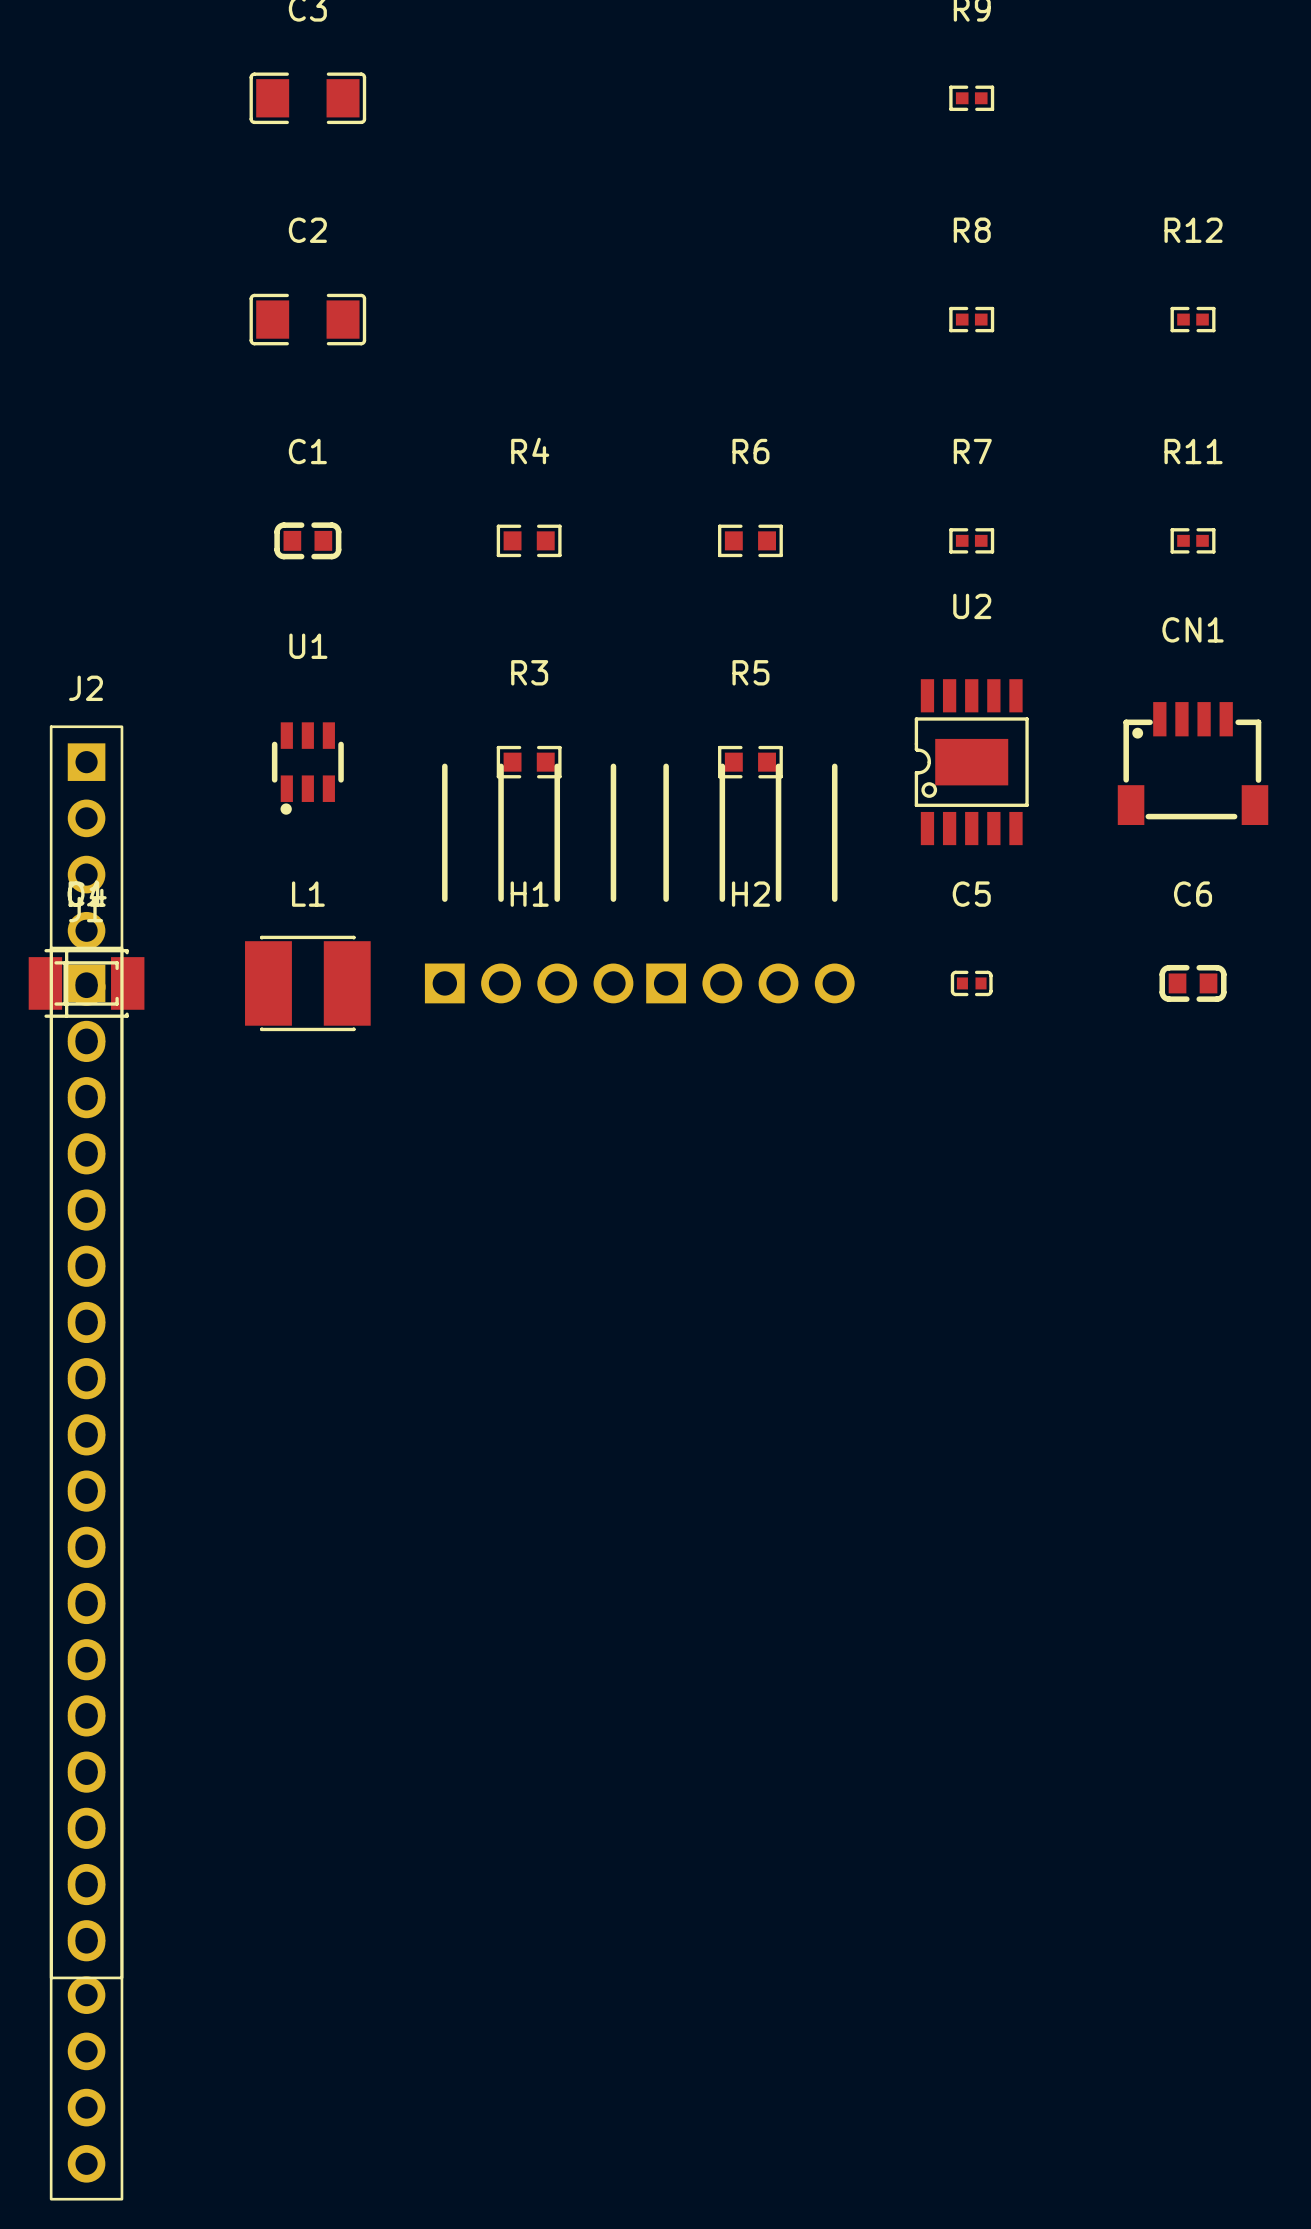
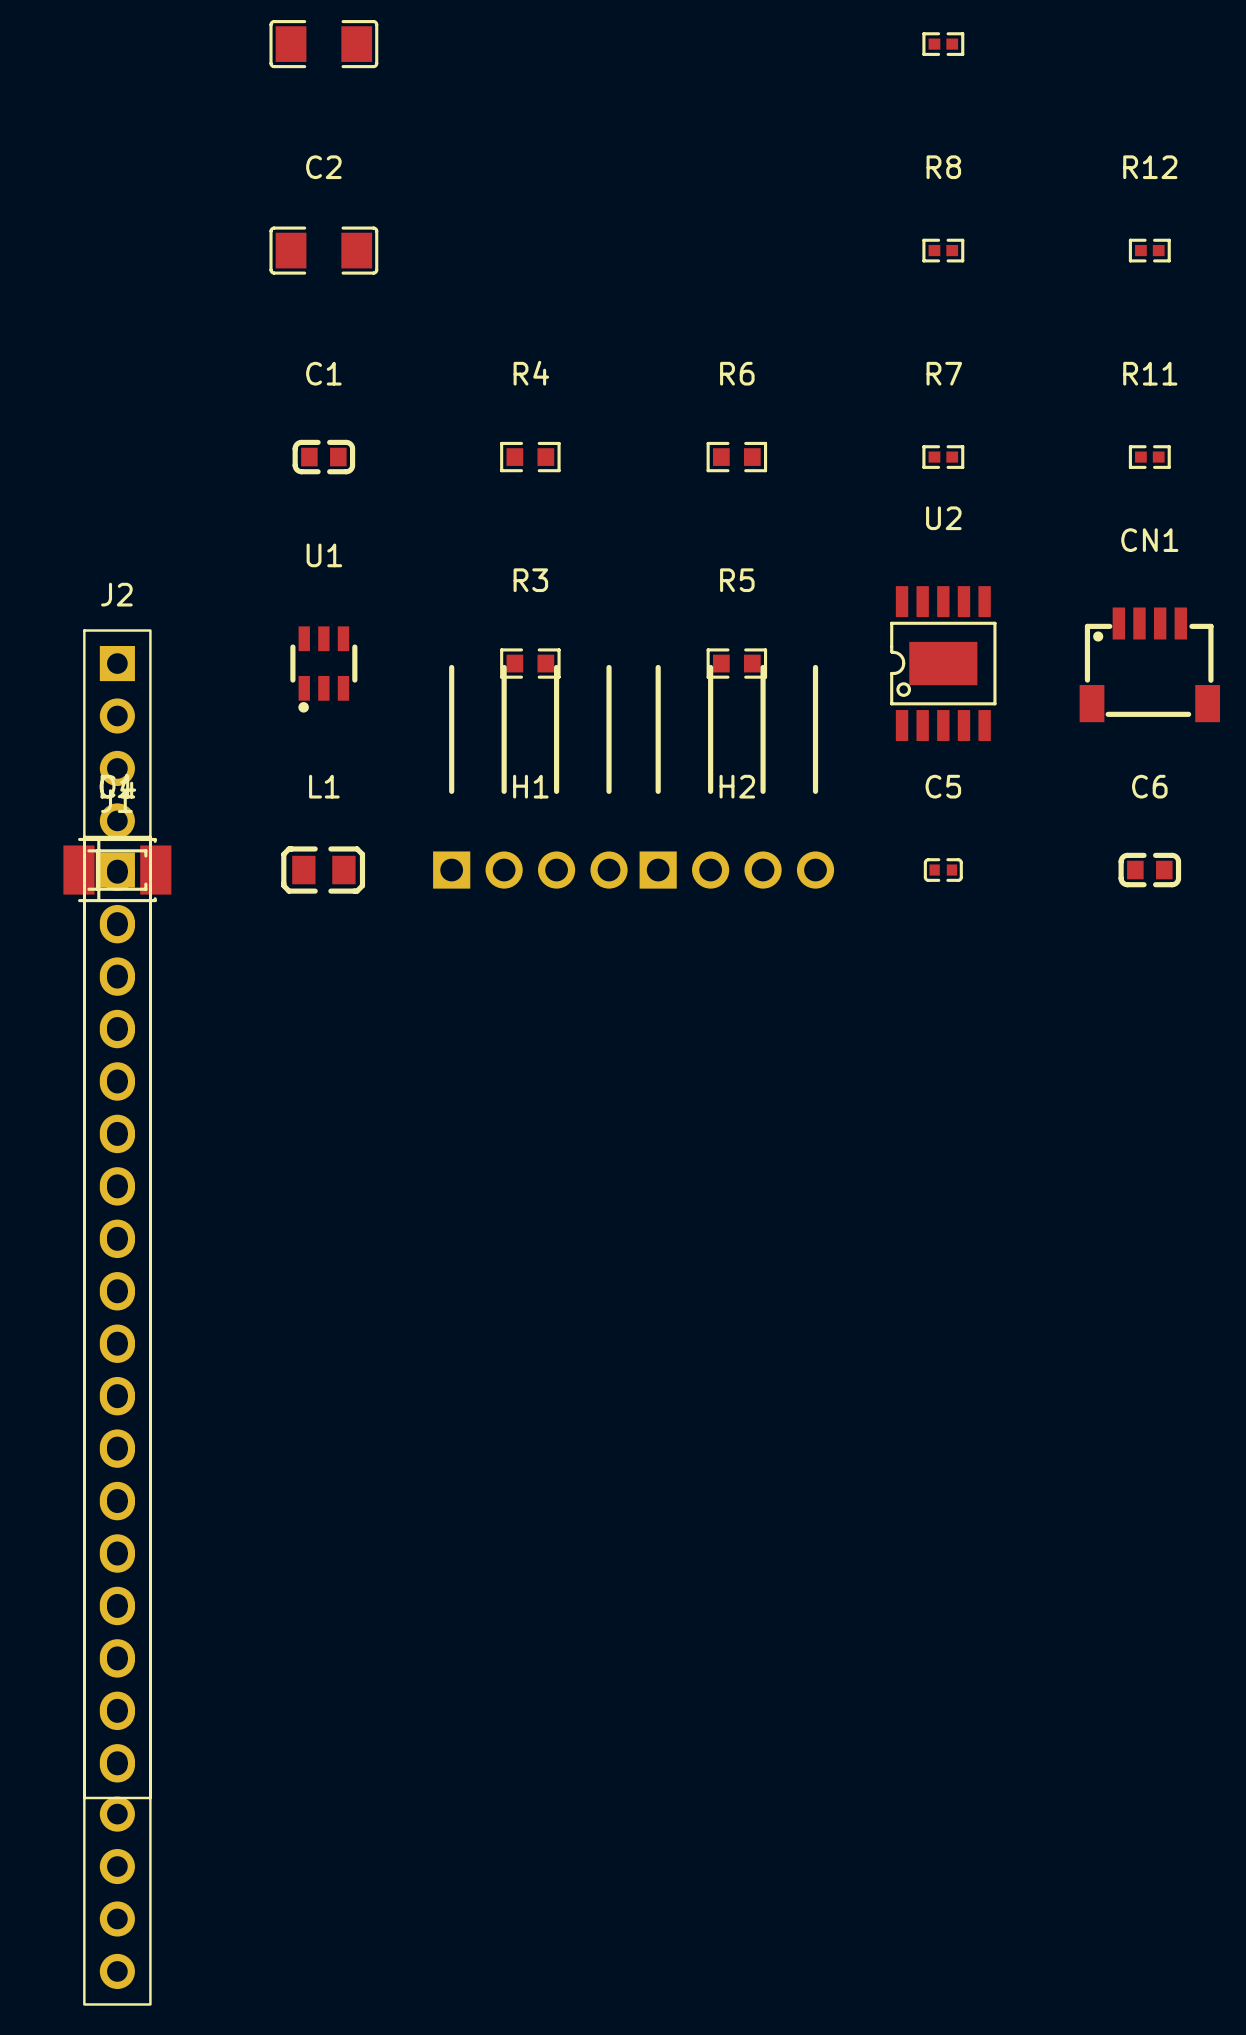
L1 footprint: [245, 935, 371, 1032] -> [281, 846, 366, 894]

